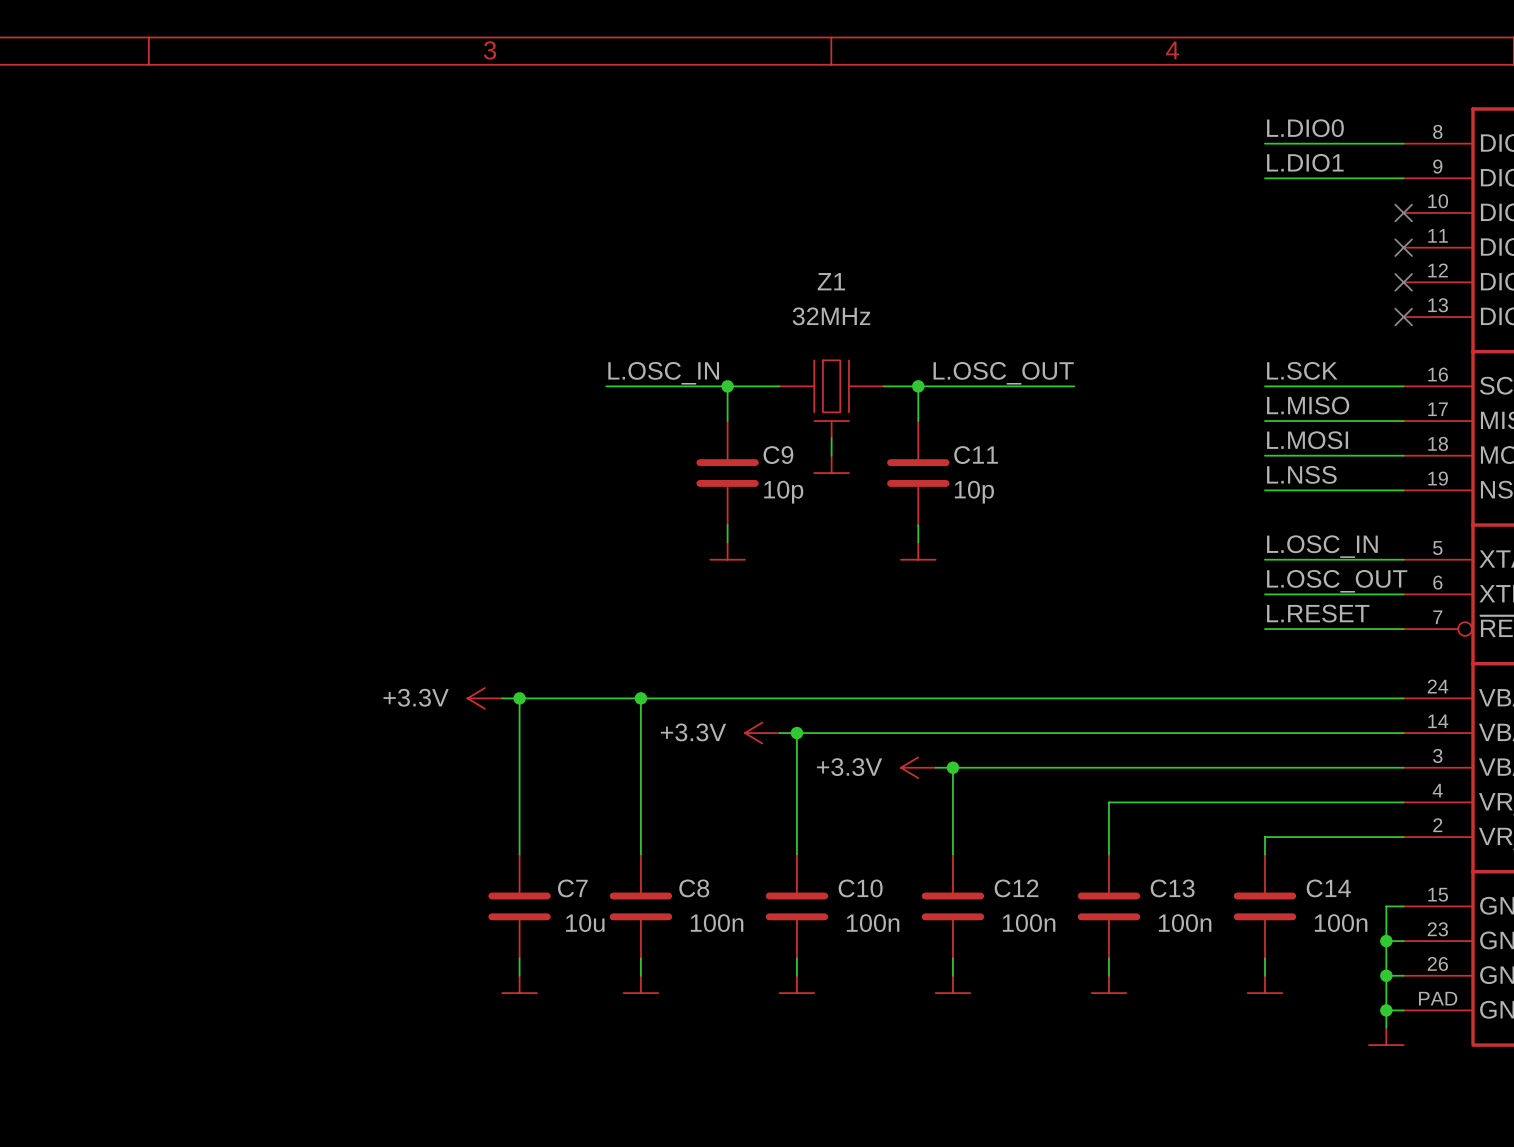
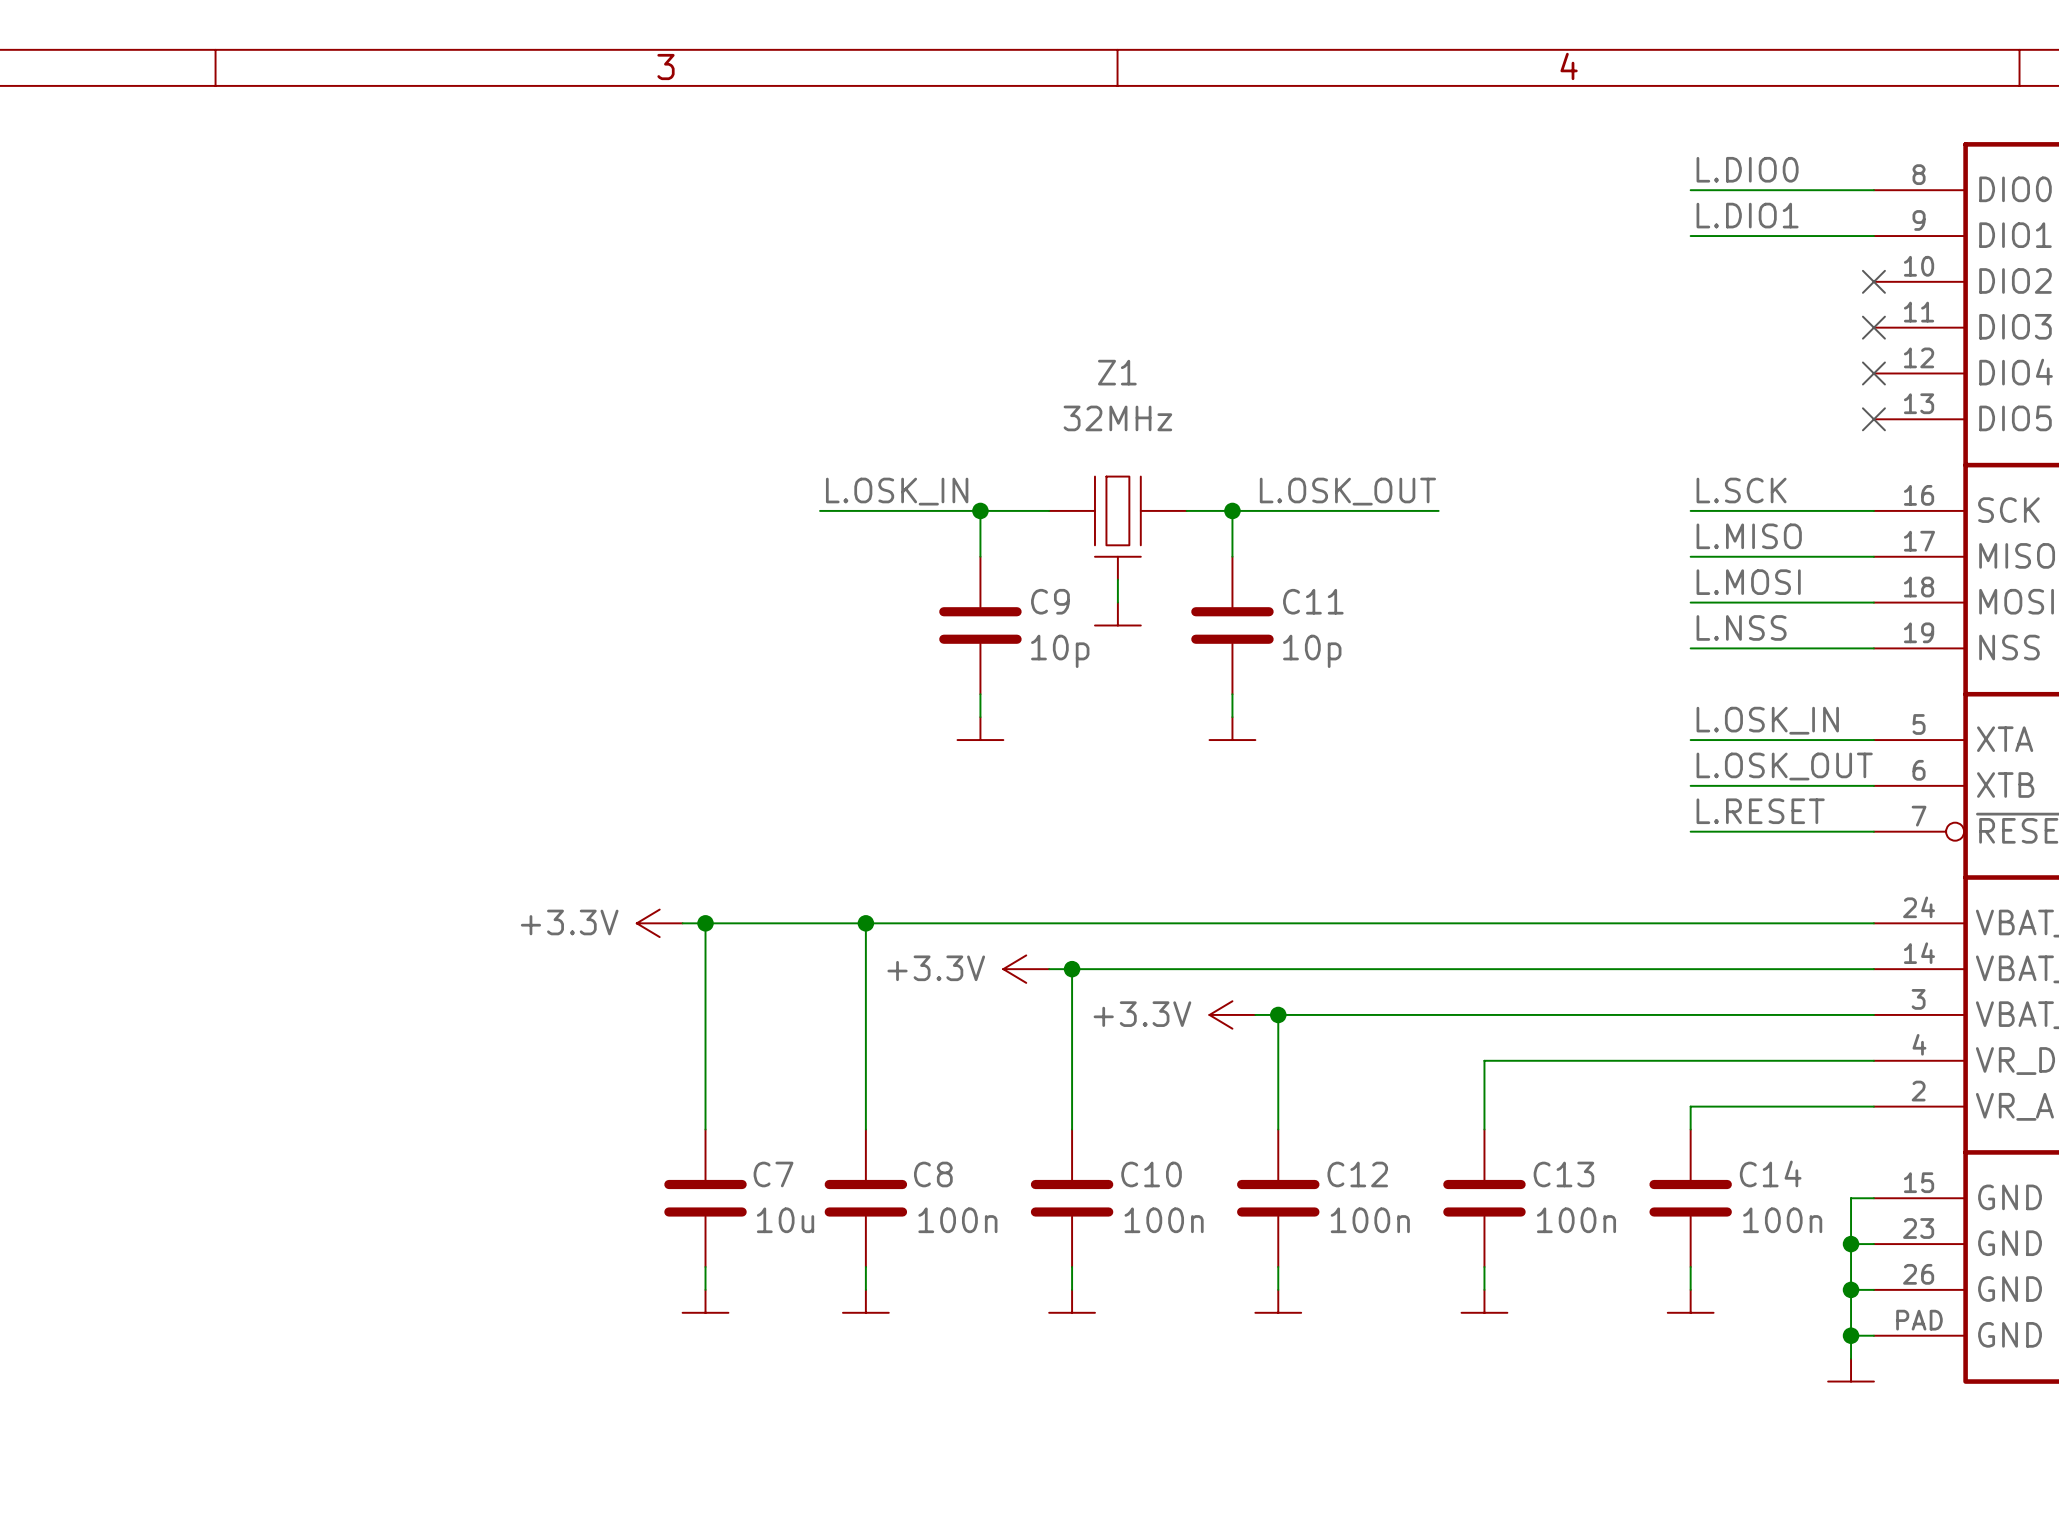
label: L.OSC_IN (663, 373) -> L.OSK_IN (897, 491)
label: L.OSC_OUT (1003, 373) -> L.OSK_OUT (1347, 491)
label: L.OSC_IN (1322, 546) -> L.OSK_IN (1767, 720)
label: L.OSC_OUT (1337, 581) -> L.OSK_OUT (1784, 766)

